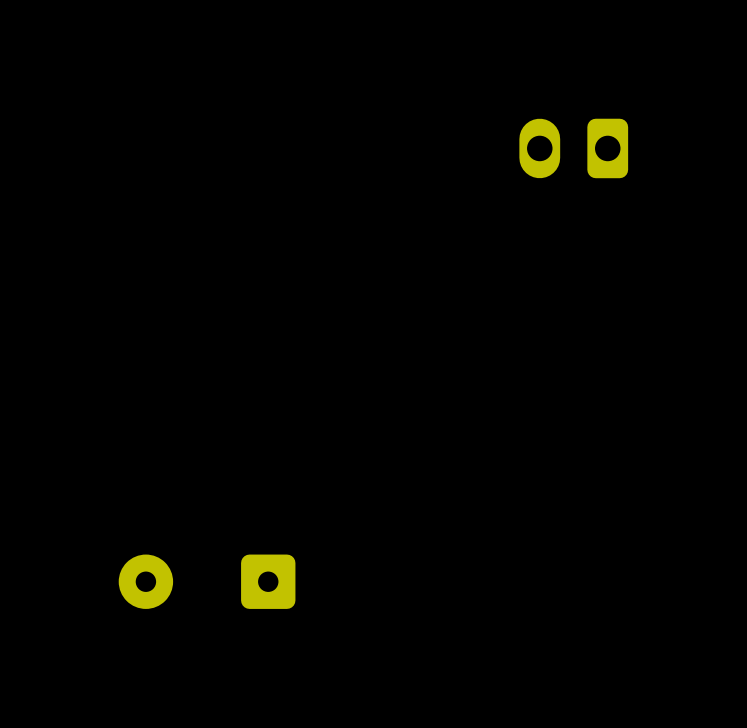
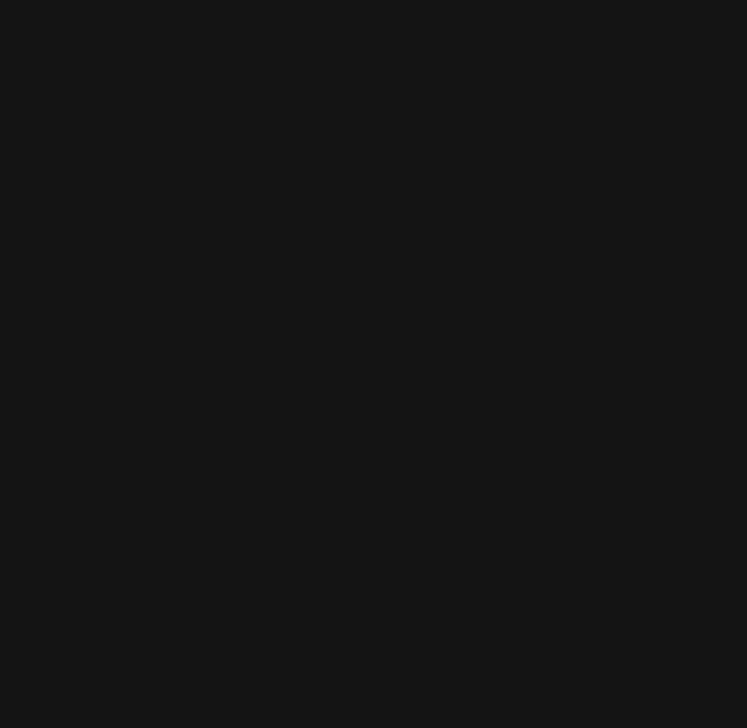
part: (573, 148) -> none
part: (207, 581) -> none

